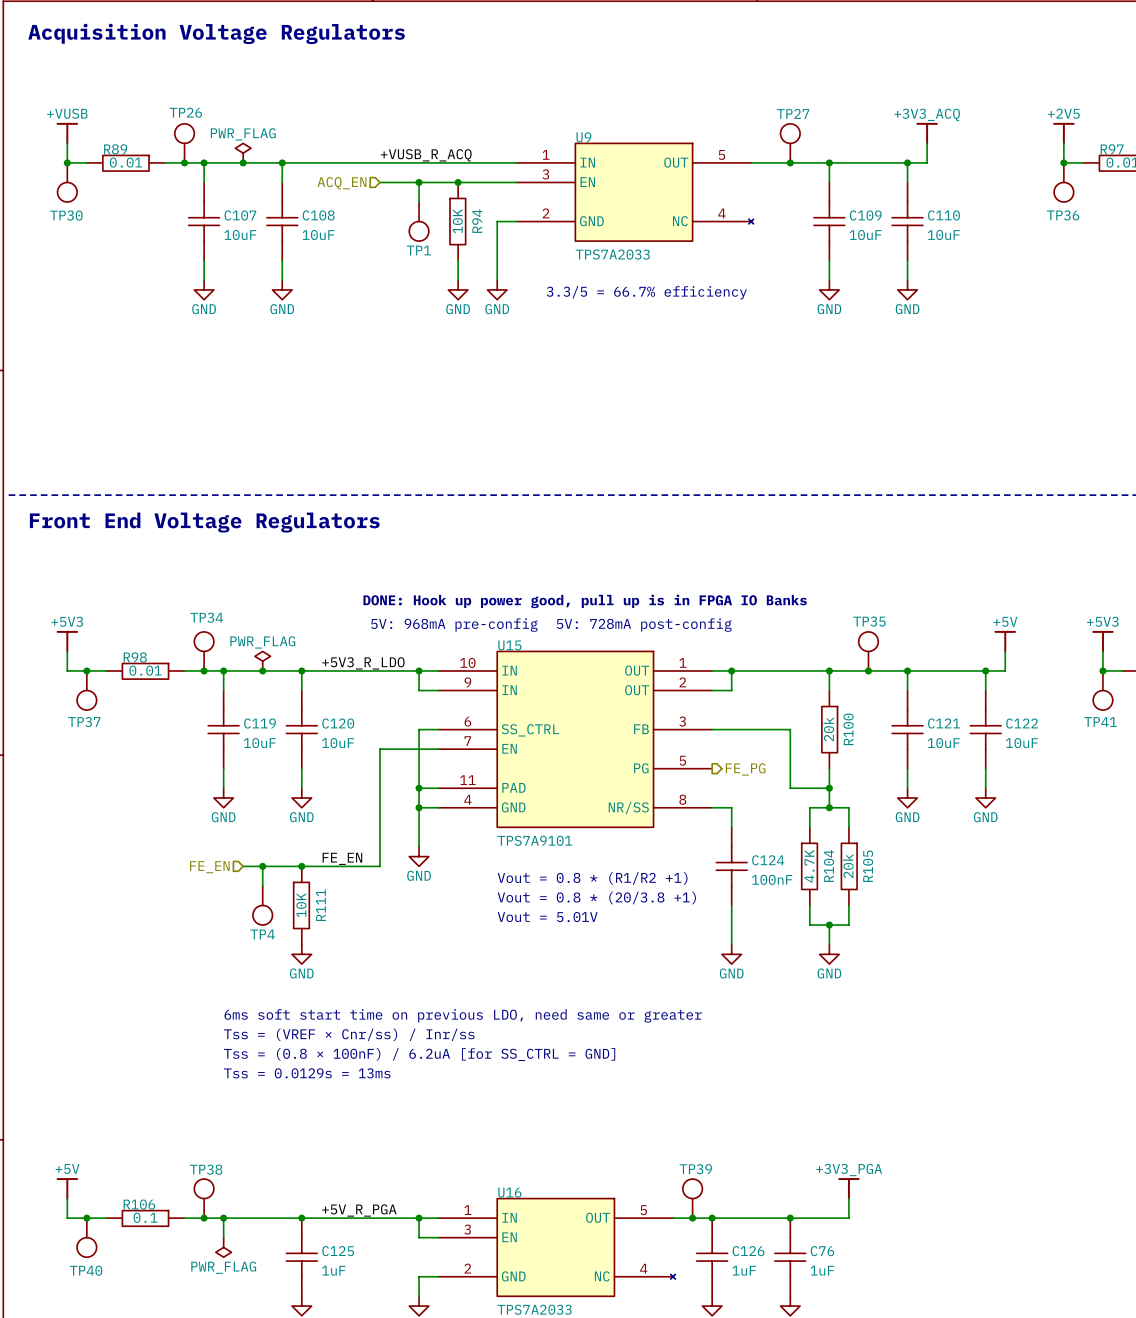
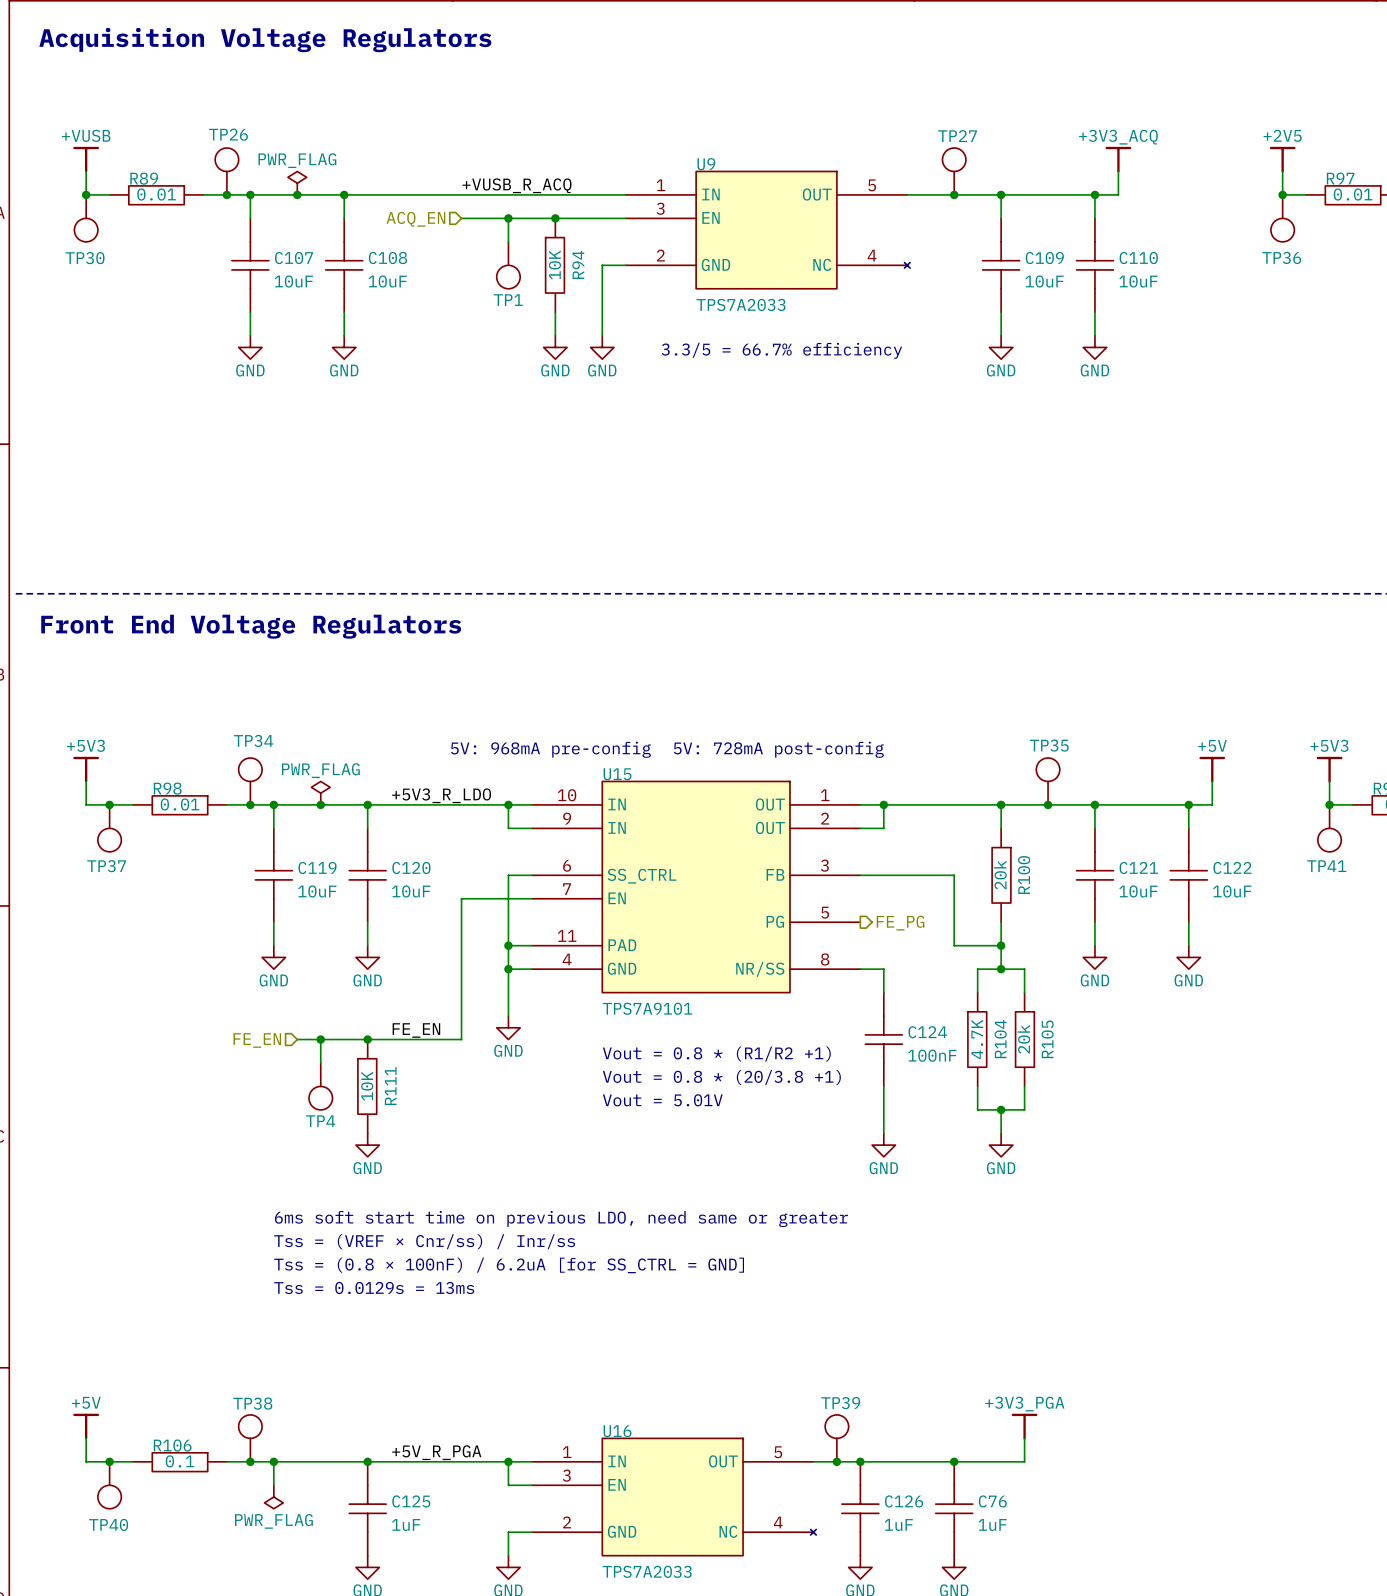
text: DONE: Hook up power good, pull up is in FPGA IO Banks (585, 601) -> none

